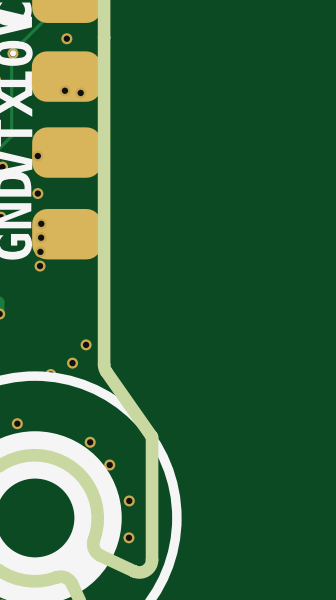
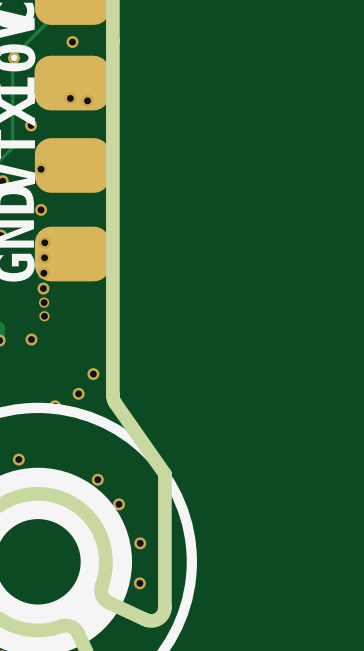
via: none -> (31, 125)
via: none -> (44, 302)
via: none -> (44, 316)
via: none -> (31, 339)

